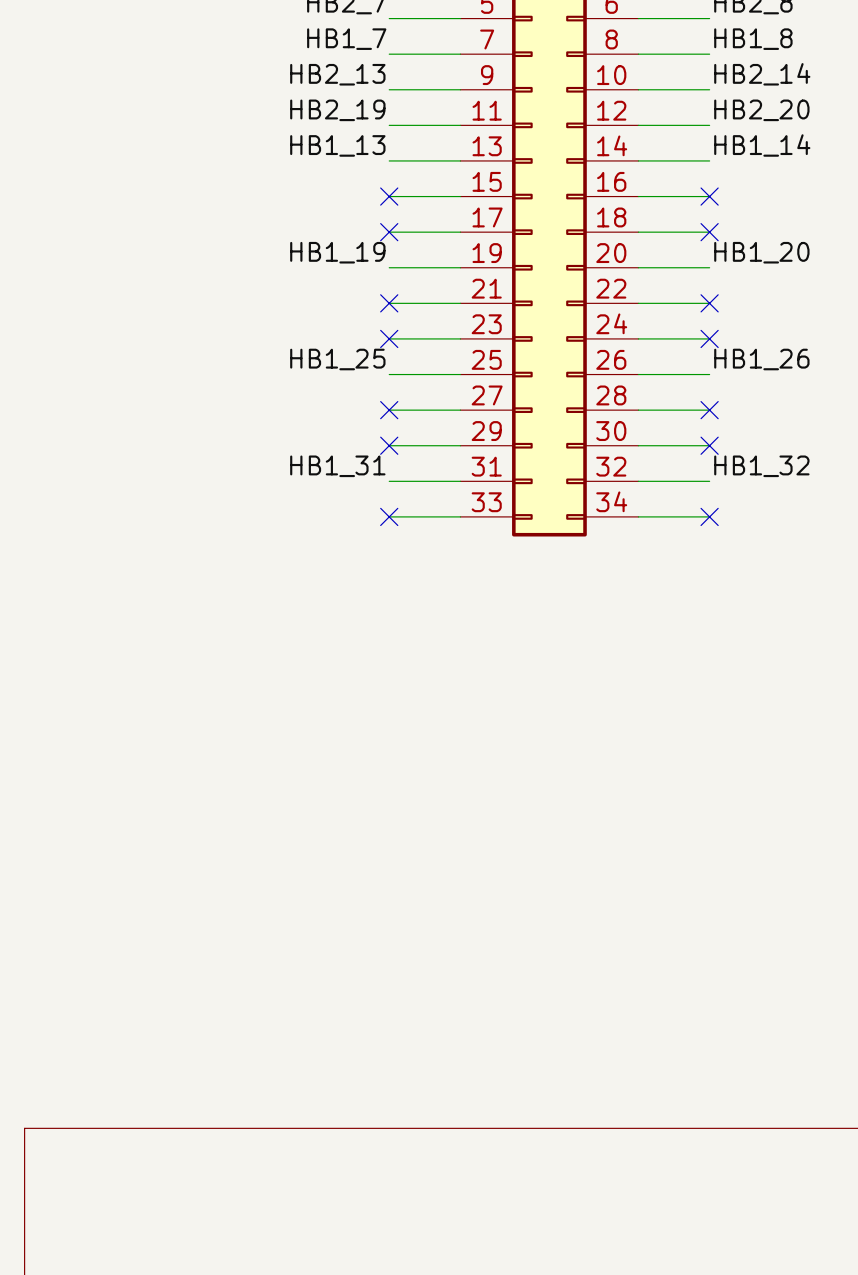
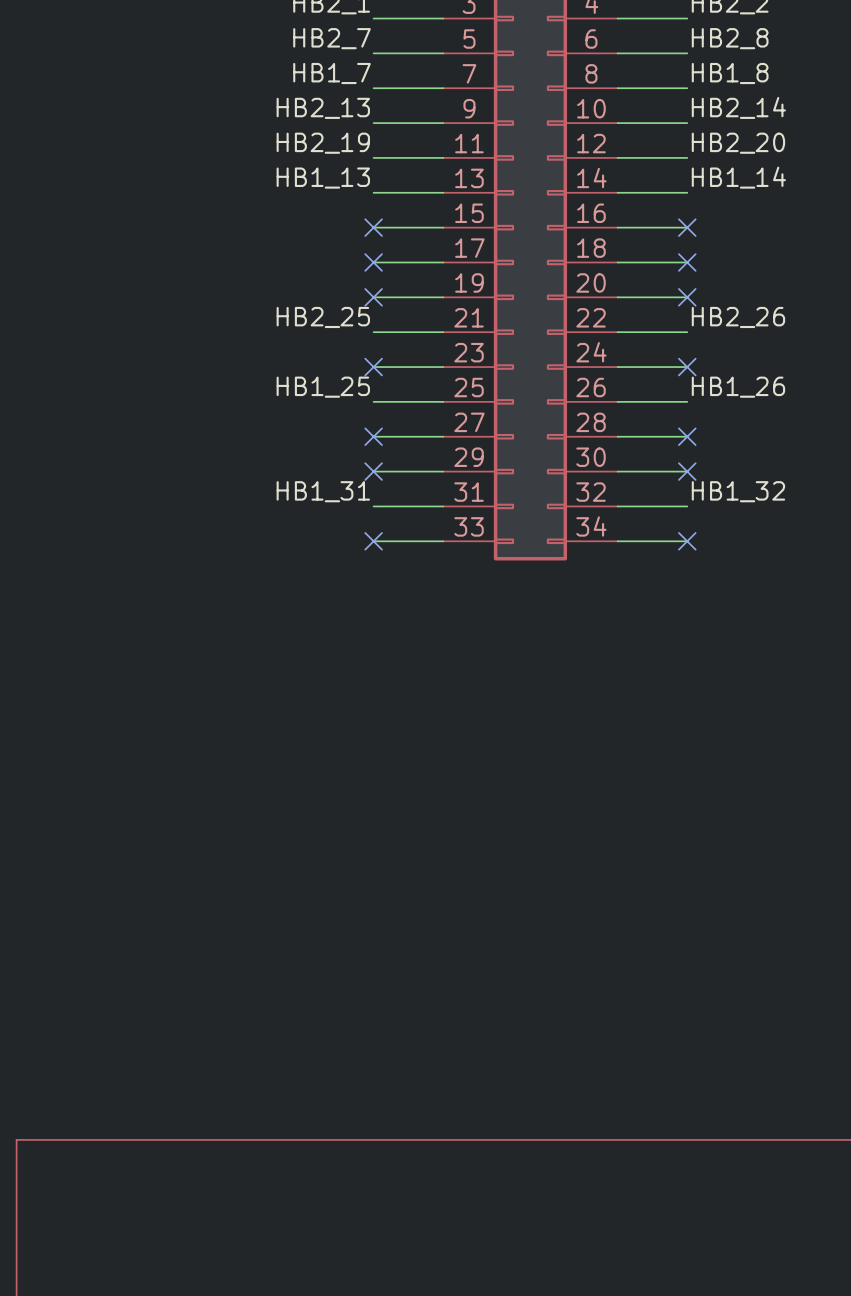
label: HB1_19 (337, 252) -> none
label: HB1_20 (761, 252) -> HB2_26 (738, 317)
label: none -> HB2_25 (323, 317)
no-connect mark position: (389, 303) -> (373, 297)
no-connect mark position: (709, 303) -> (687, 297)

